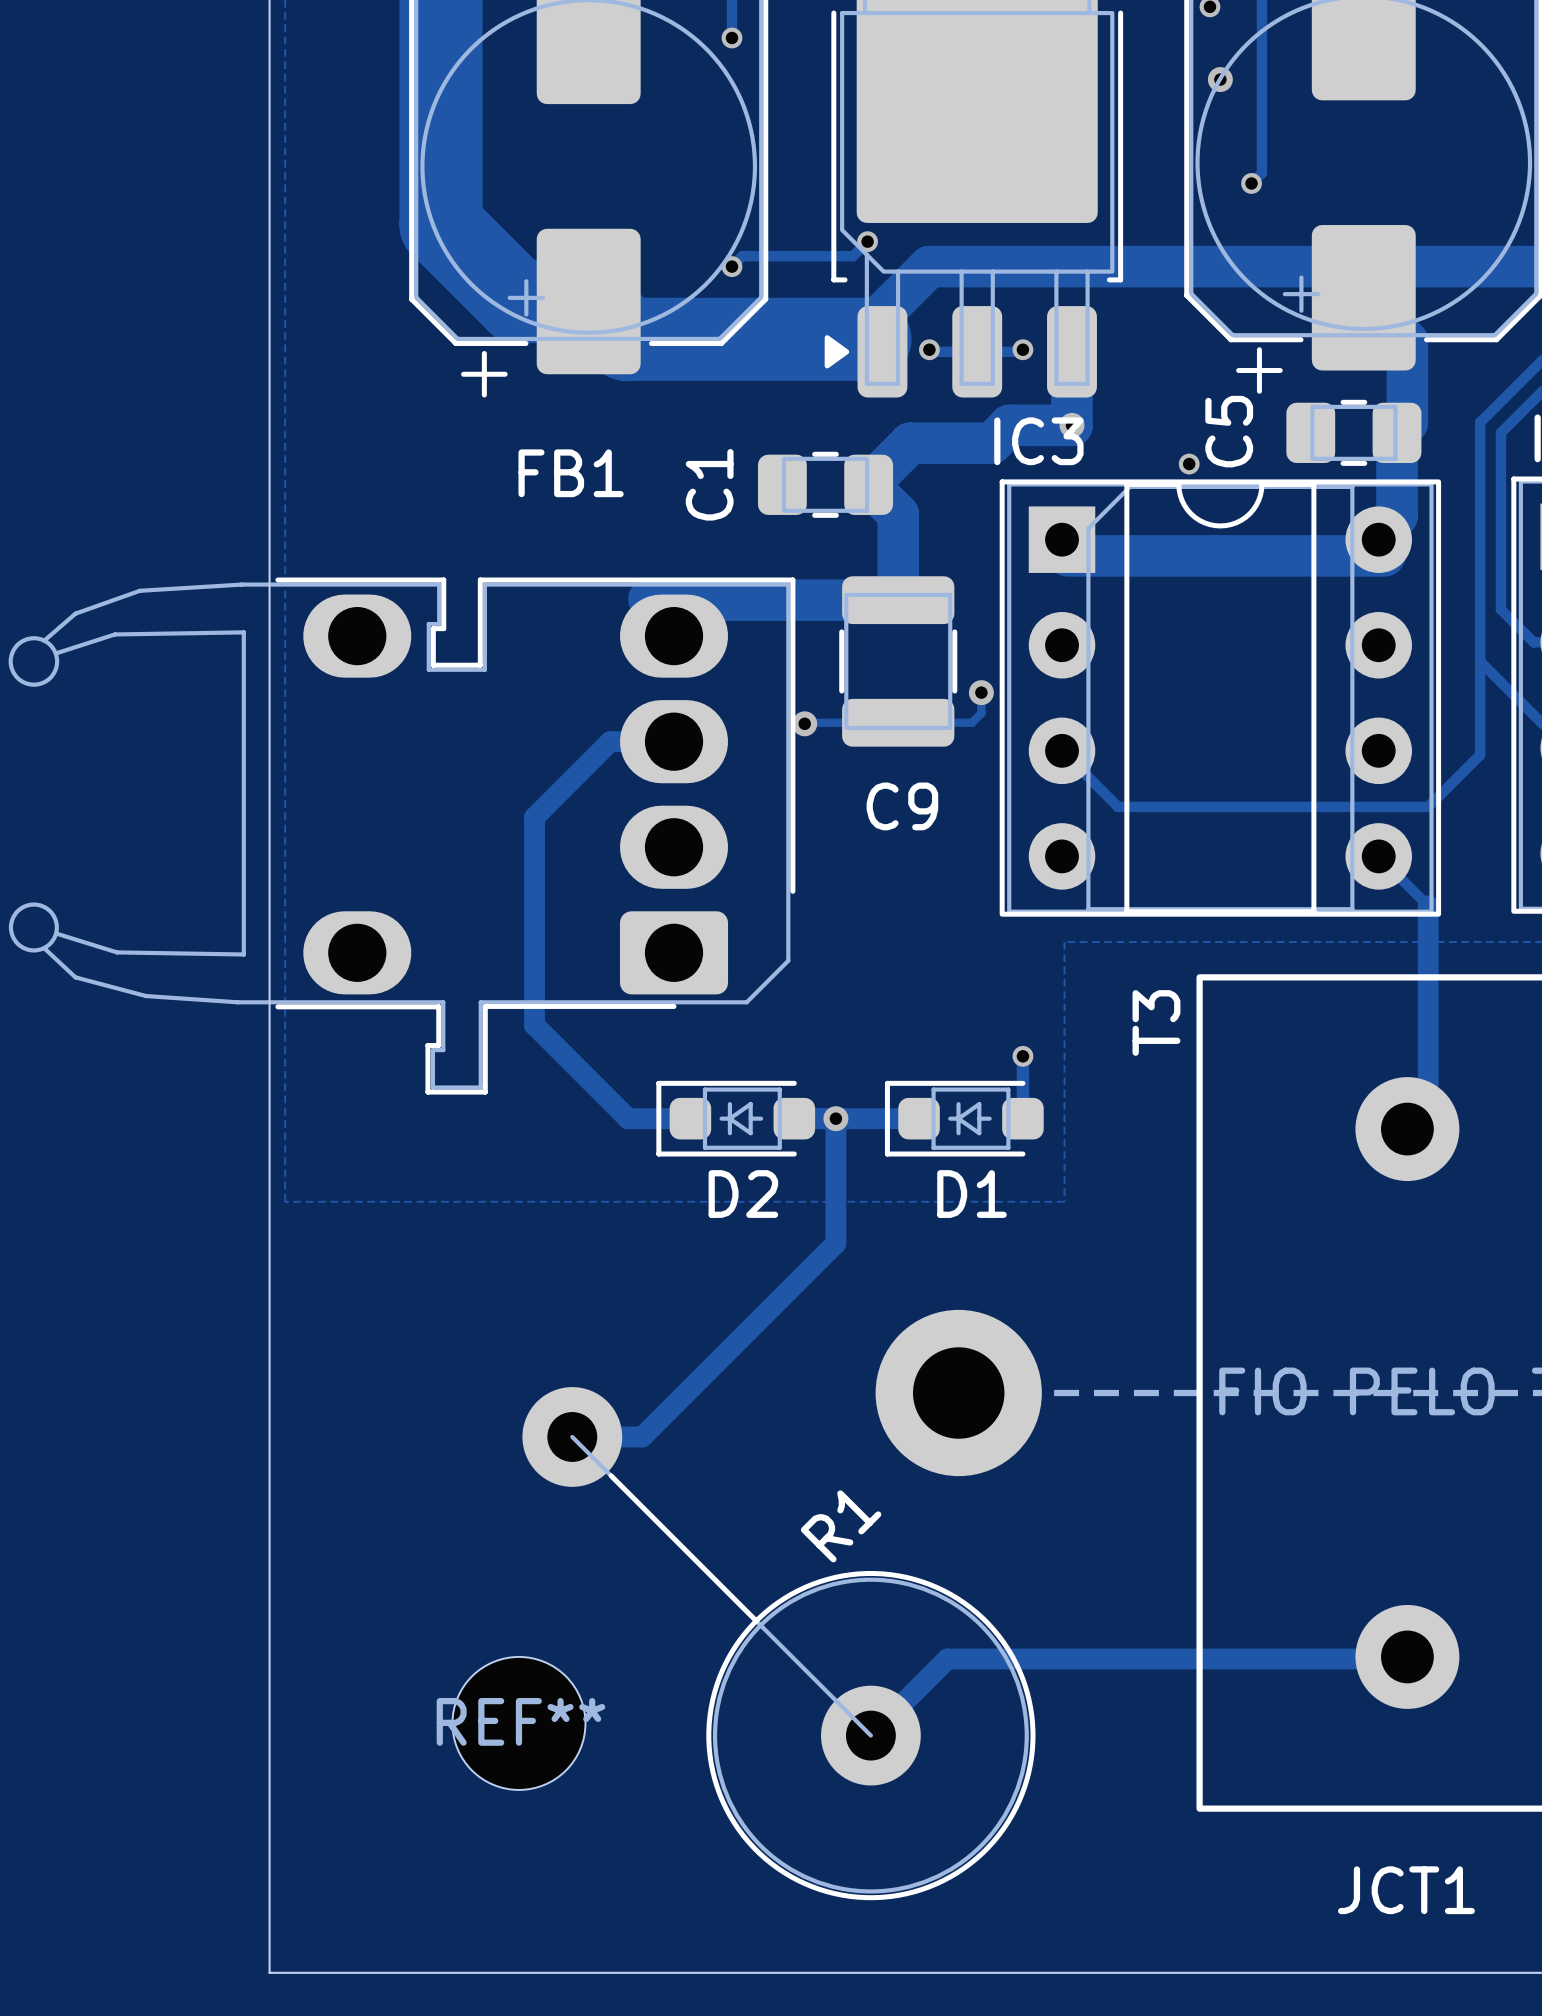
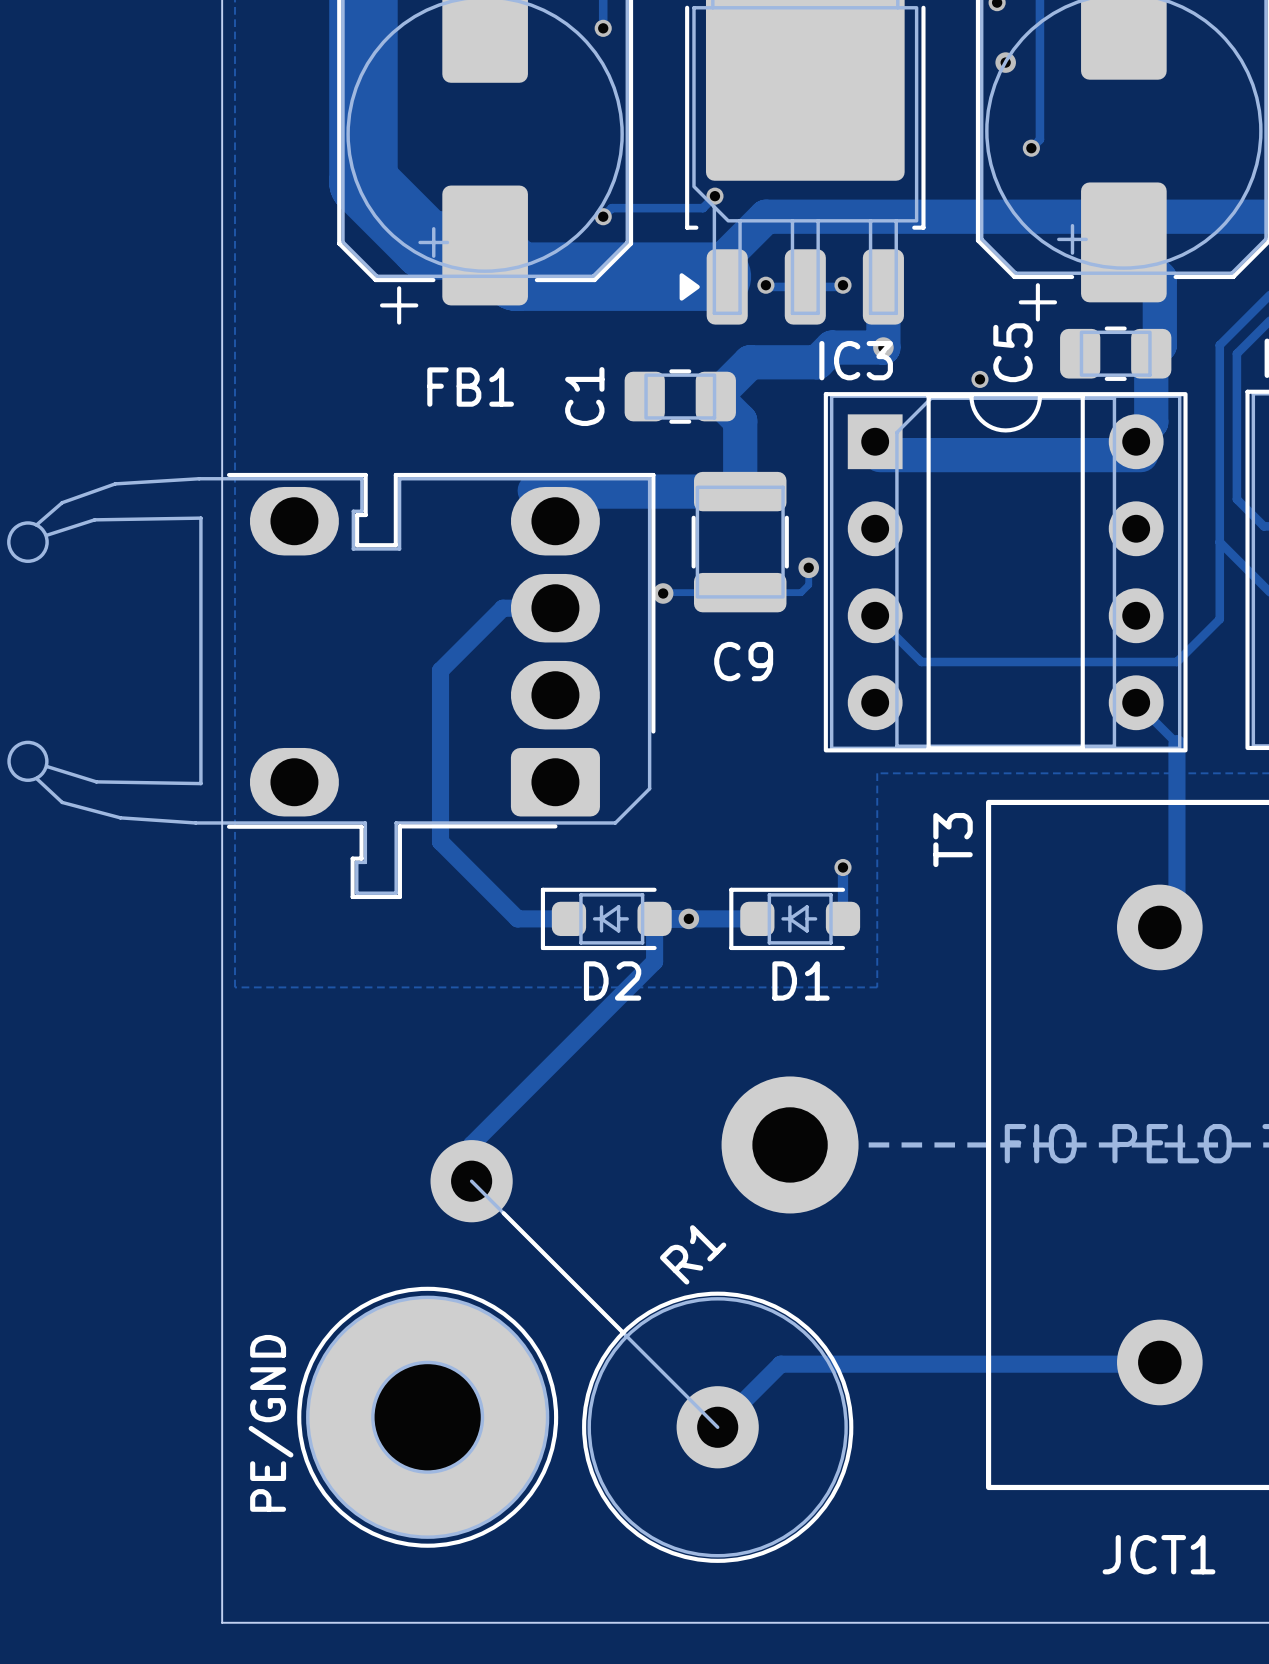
track: (835, 1118) (835, 1243) (642, 1436) (572, 1436) -> (654, 918) (654, 961) (471, 1144) (471, 1181)
REF**: (518, 1723) -> none
part: none -> (427, 1417)

